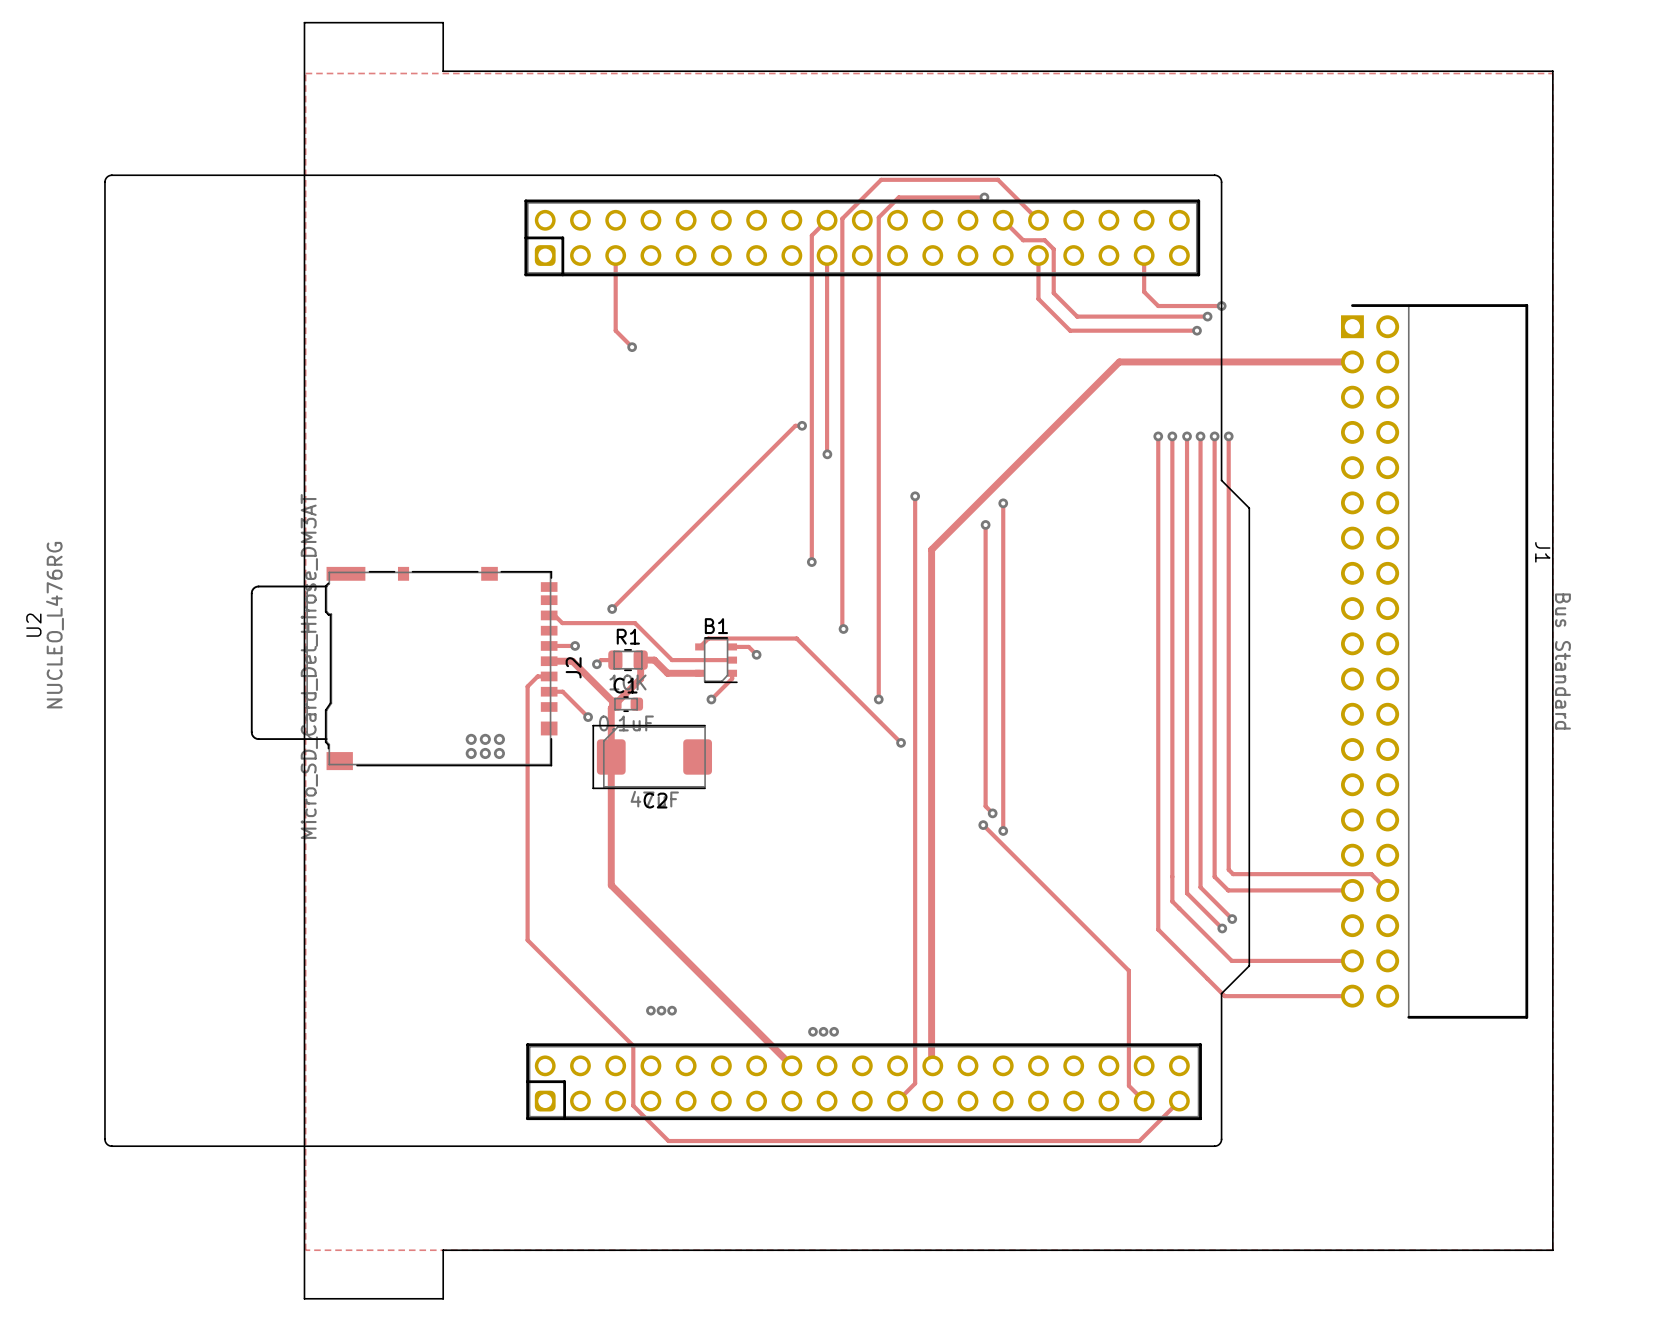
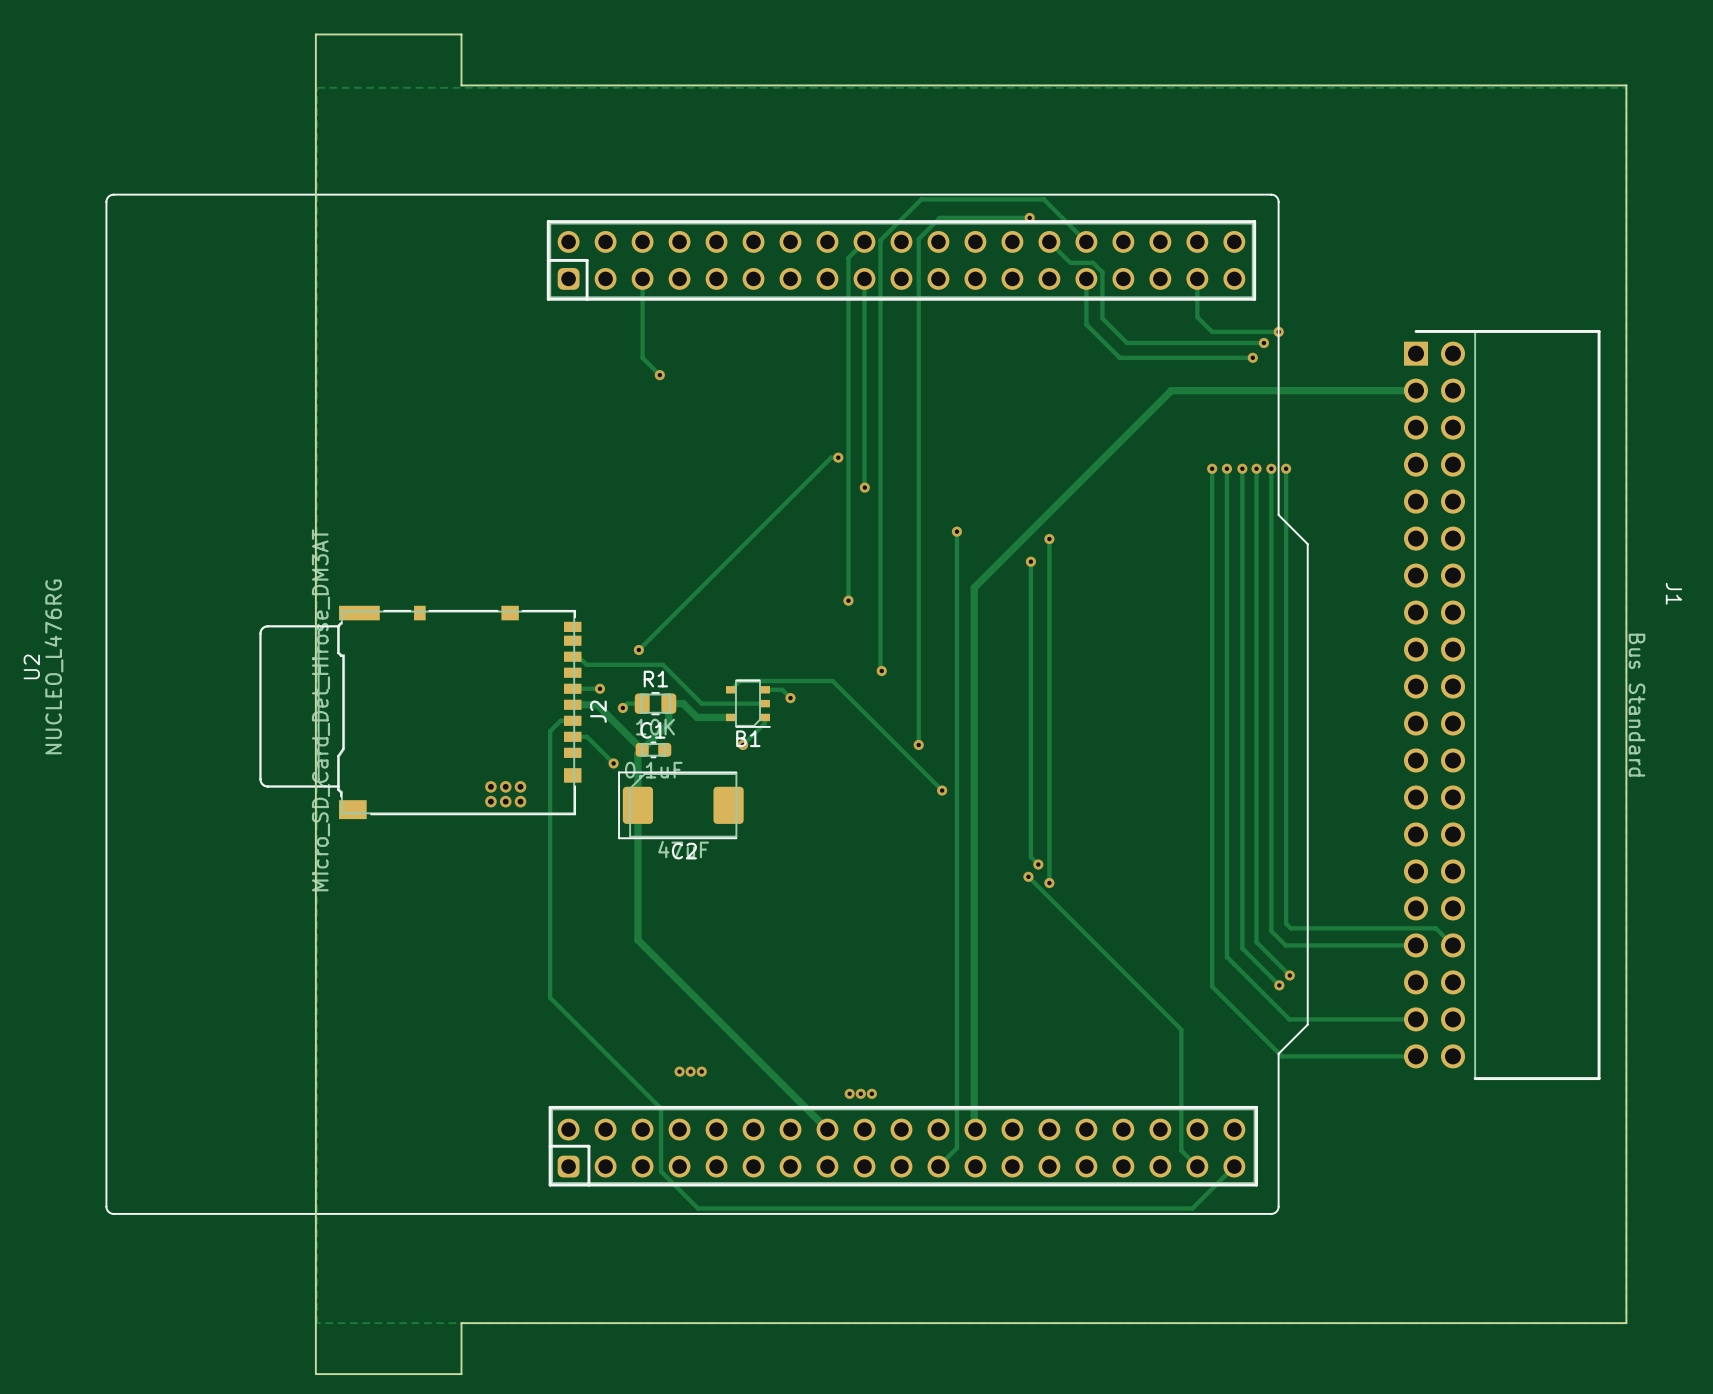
J1 name position: J1 (1542, 552) -> J1 (1673, 593)
B1 name position: B1 (716, 626) -> B1 (748, 738)

